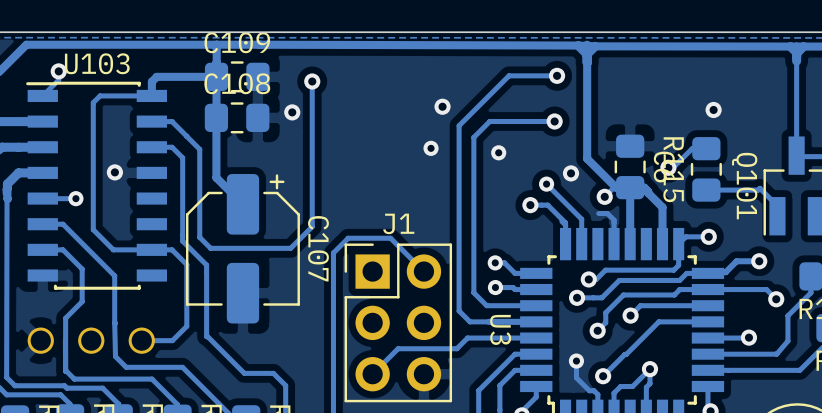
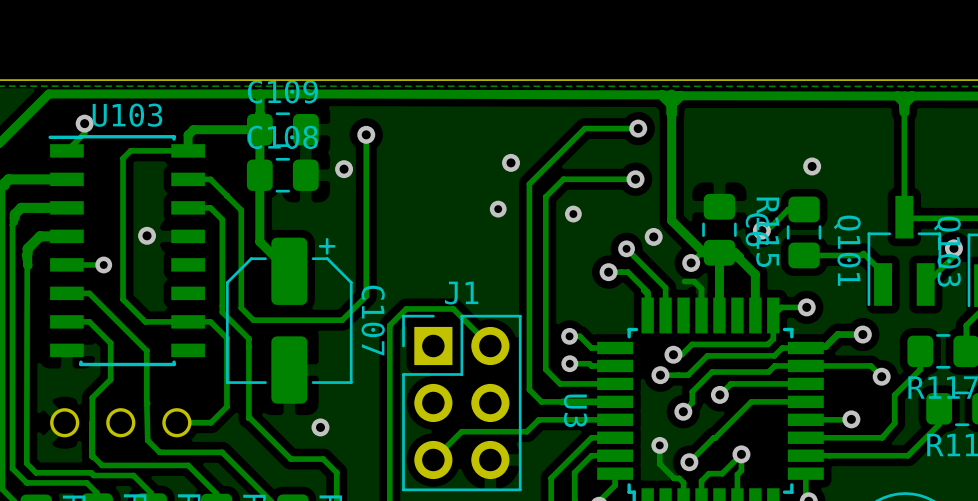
via: none -> (320, 427)

